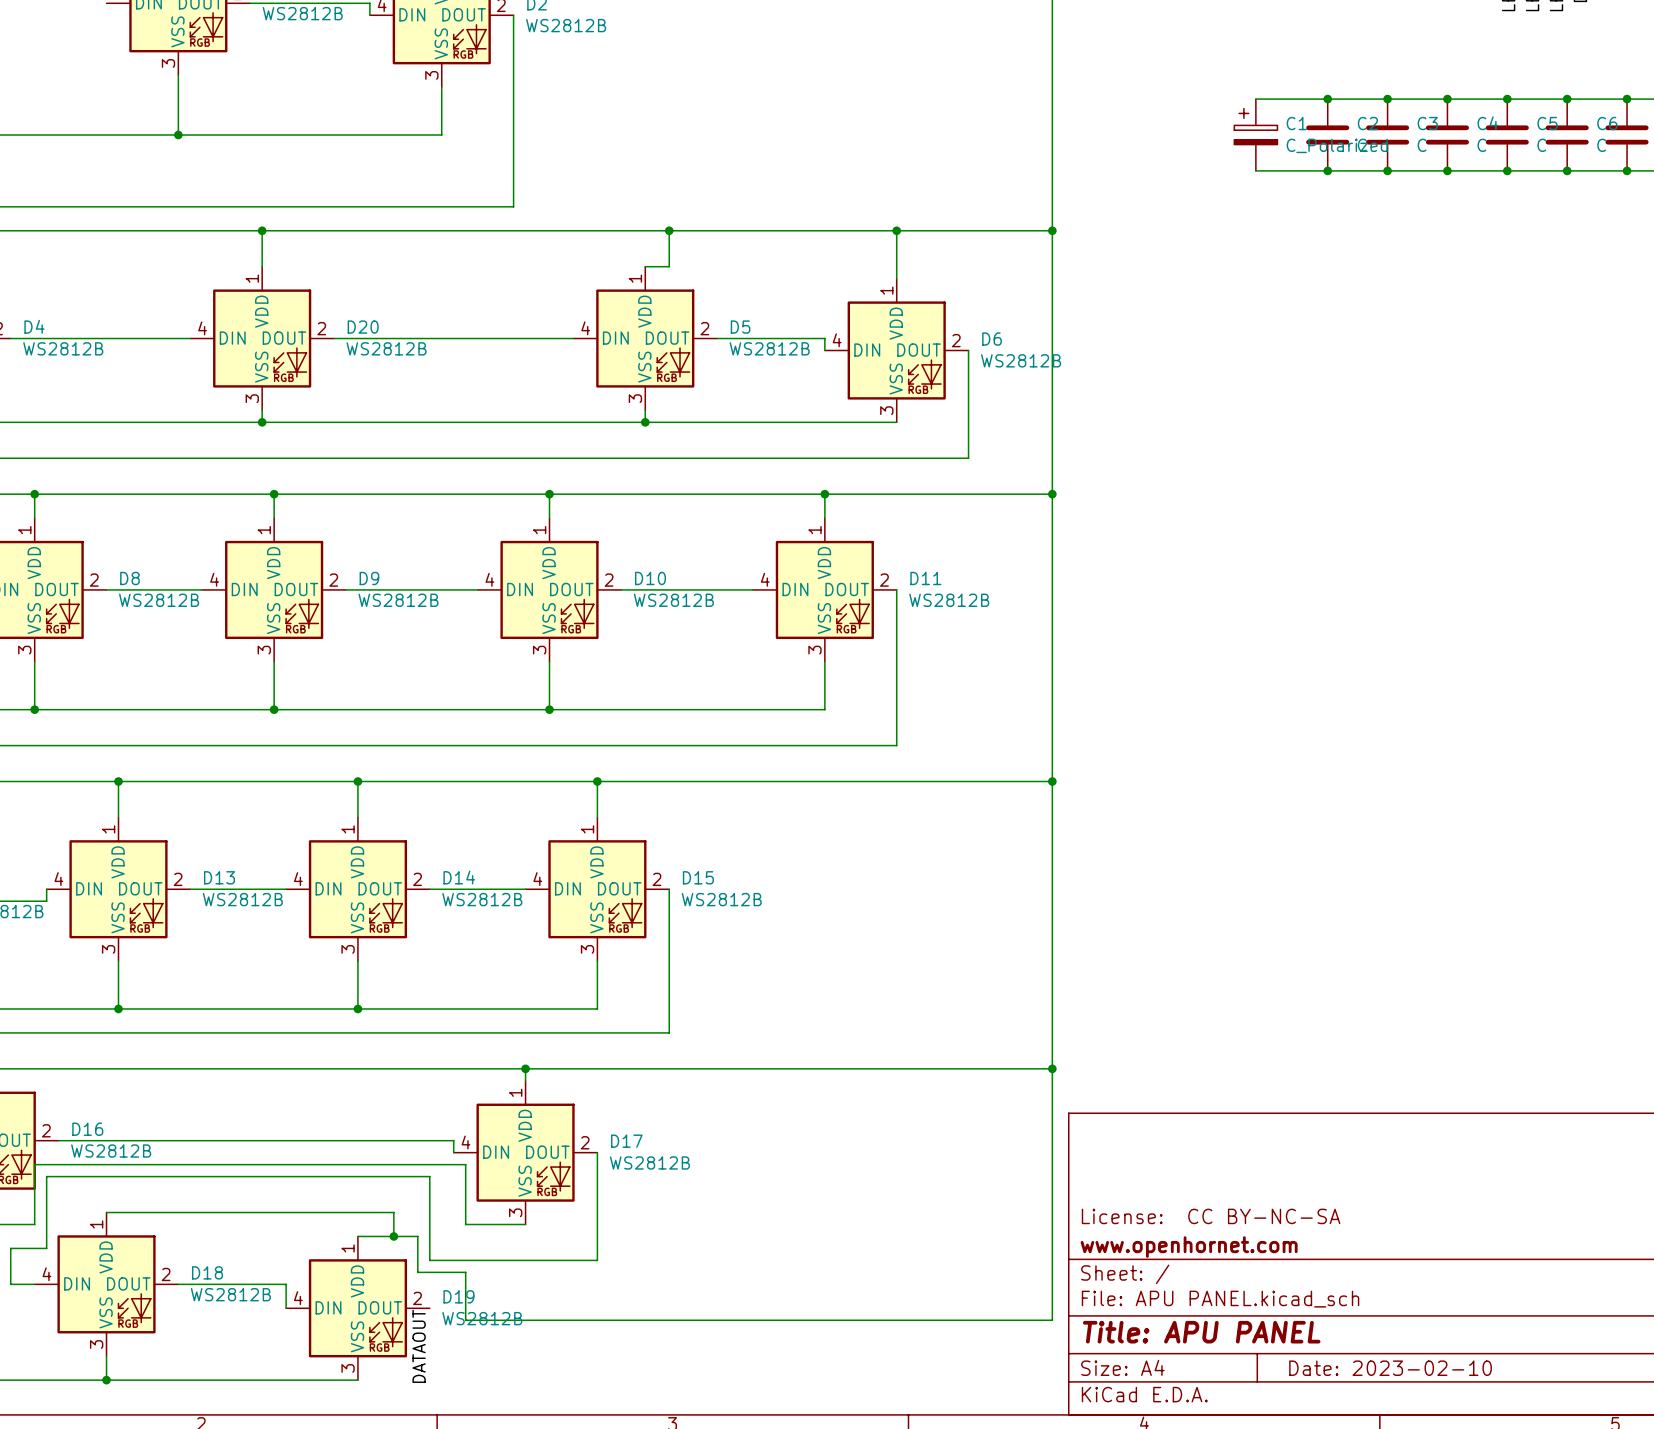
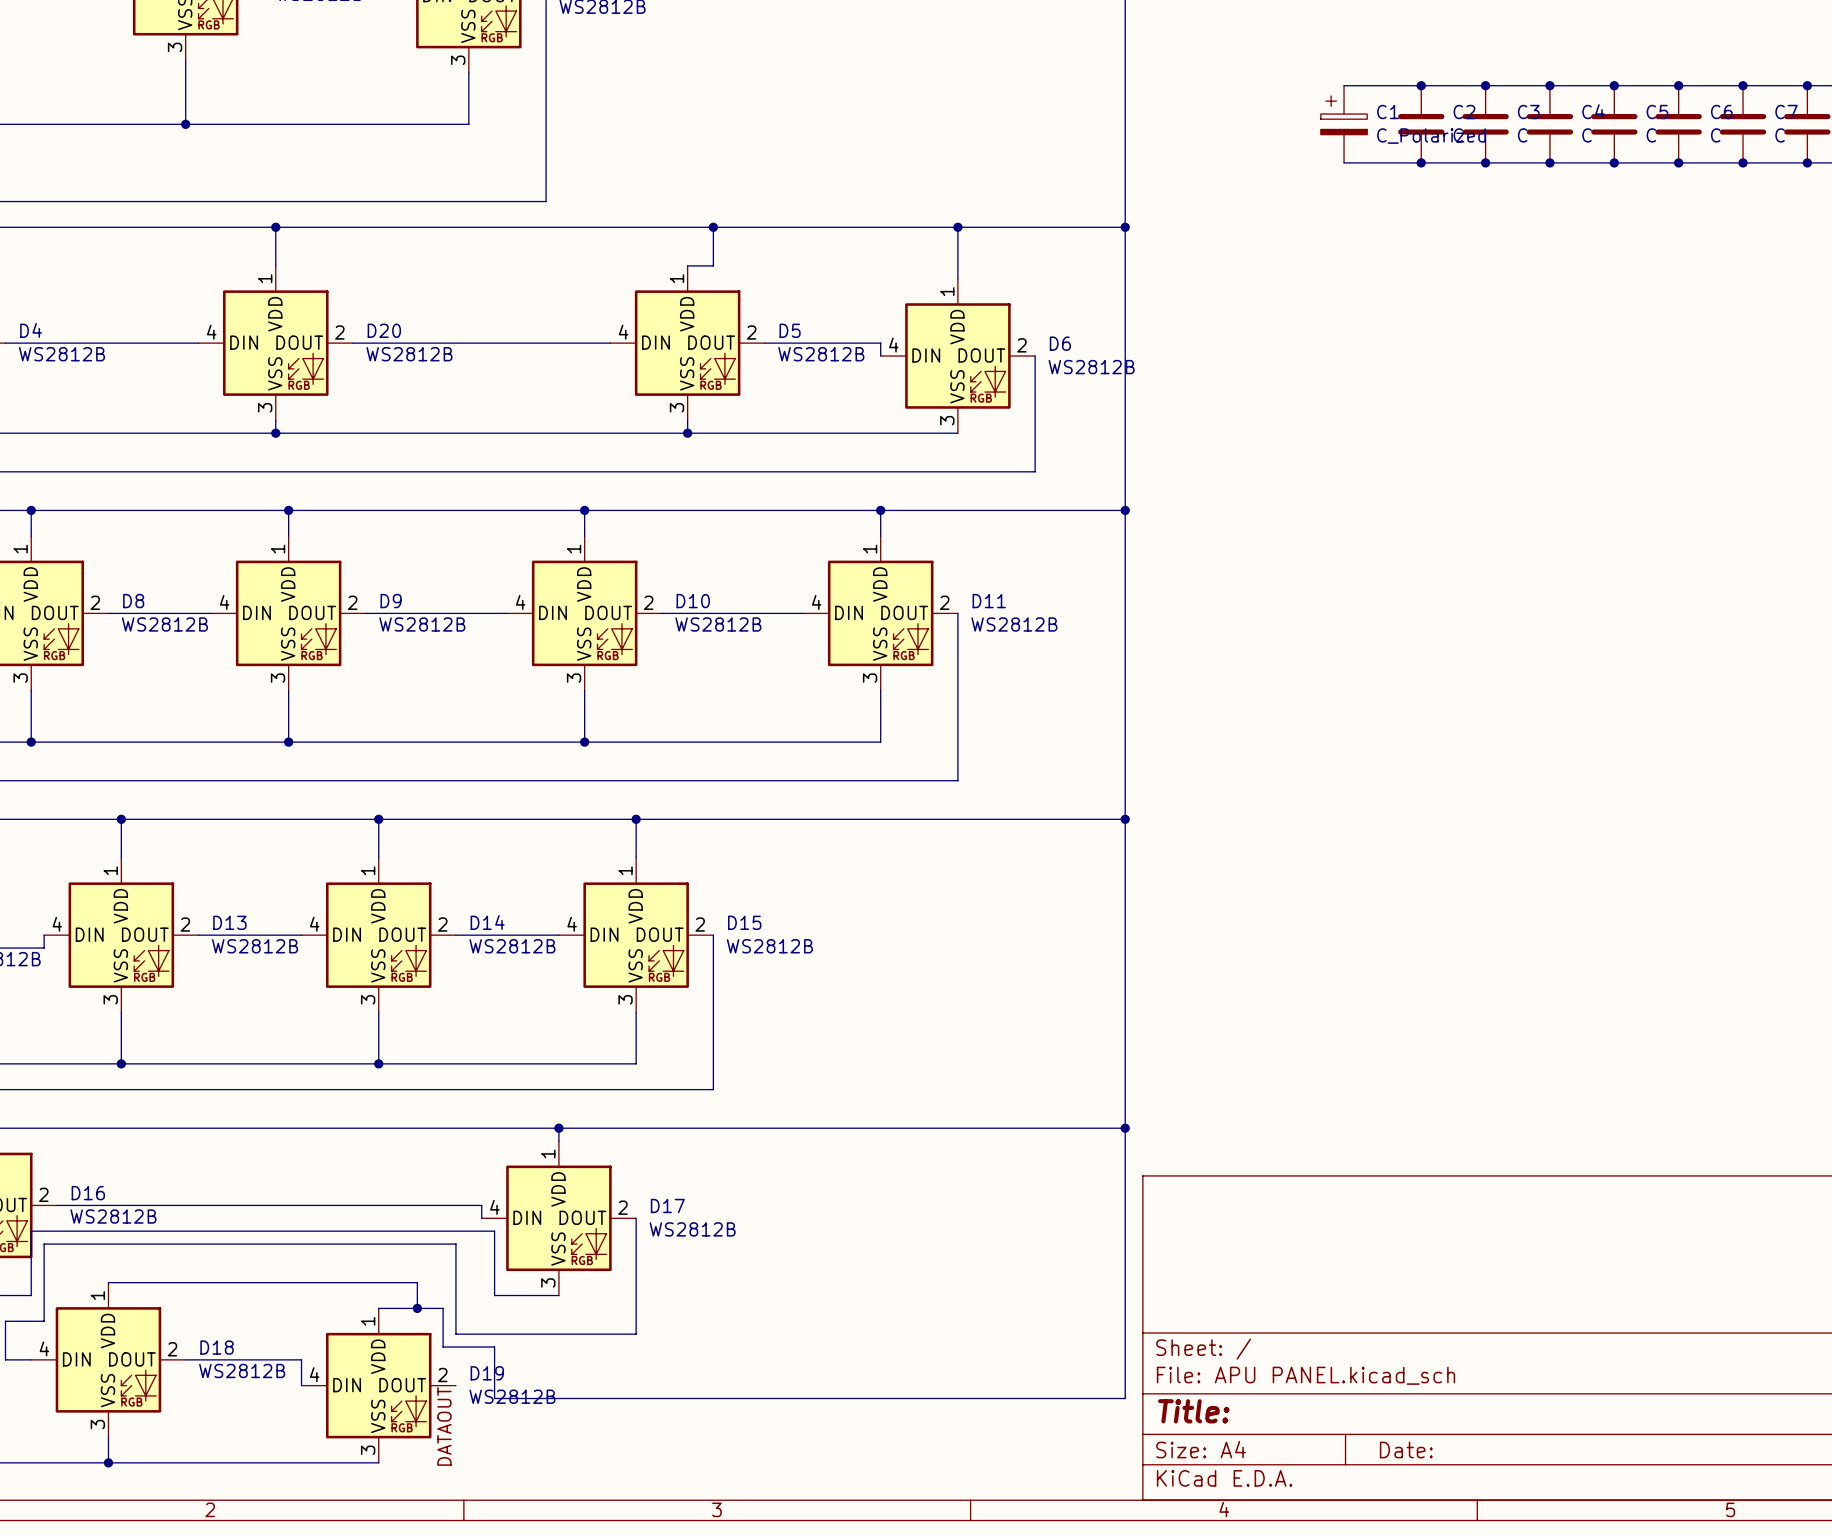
title block: License: CC BY-NC-SA (1211, 1216) -> none
title block: www.openhornet.com (1189, 1247) -> none
title block: Title: APU PANEL (1201, 1332) -> Title: (1193, 1411)
title block: Date: 2023-02-10 (1390, 1368) -> Date: (1406, 1450)

